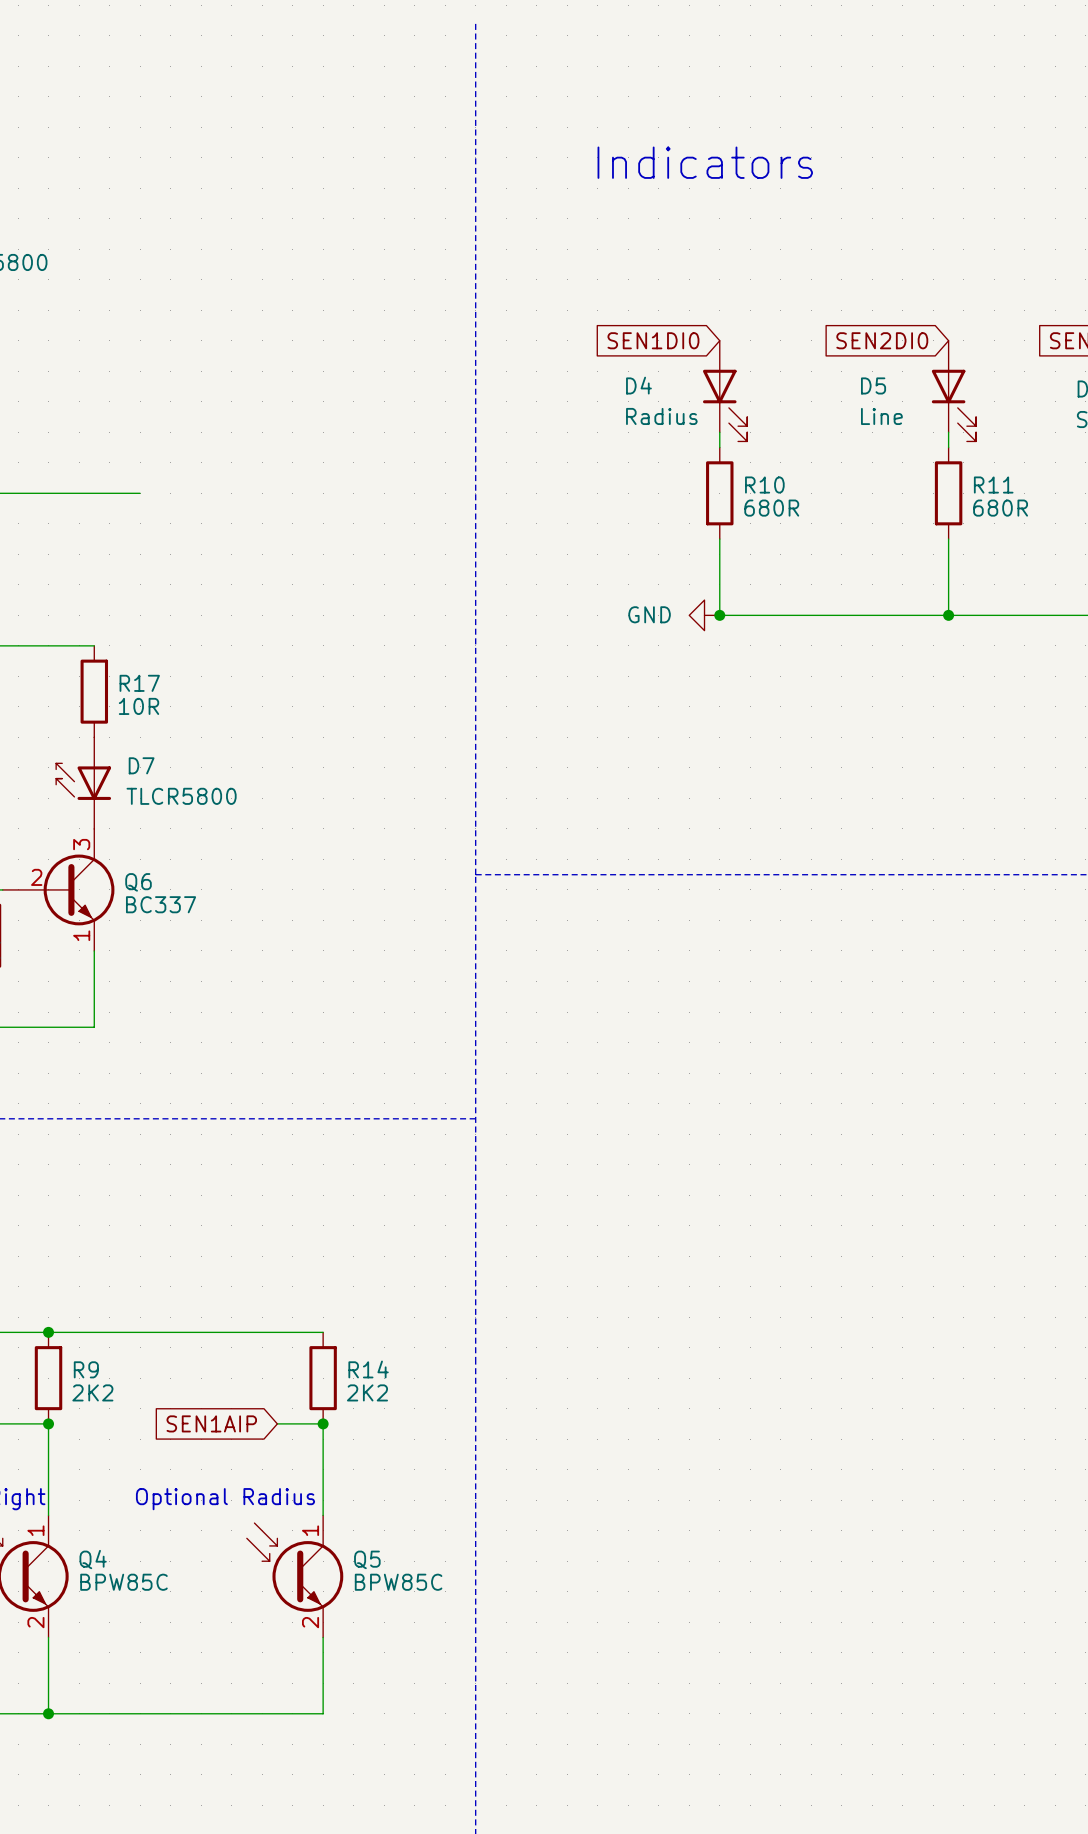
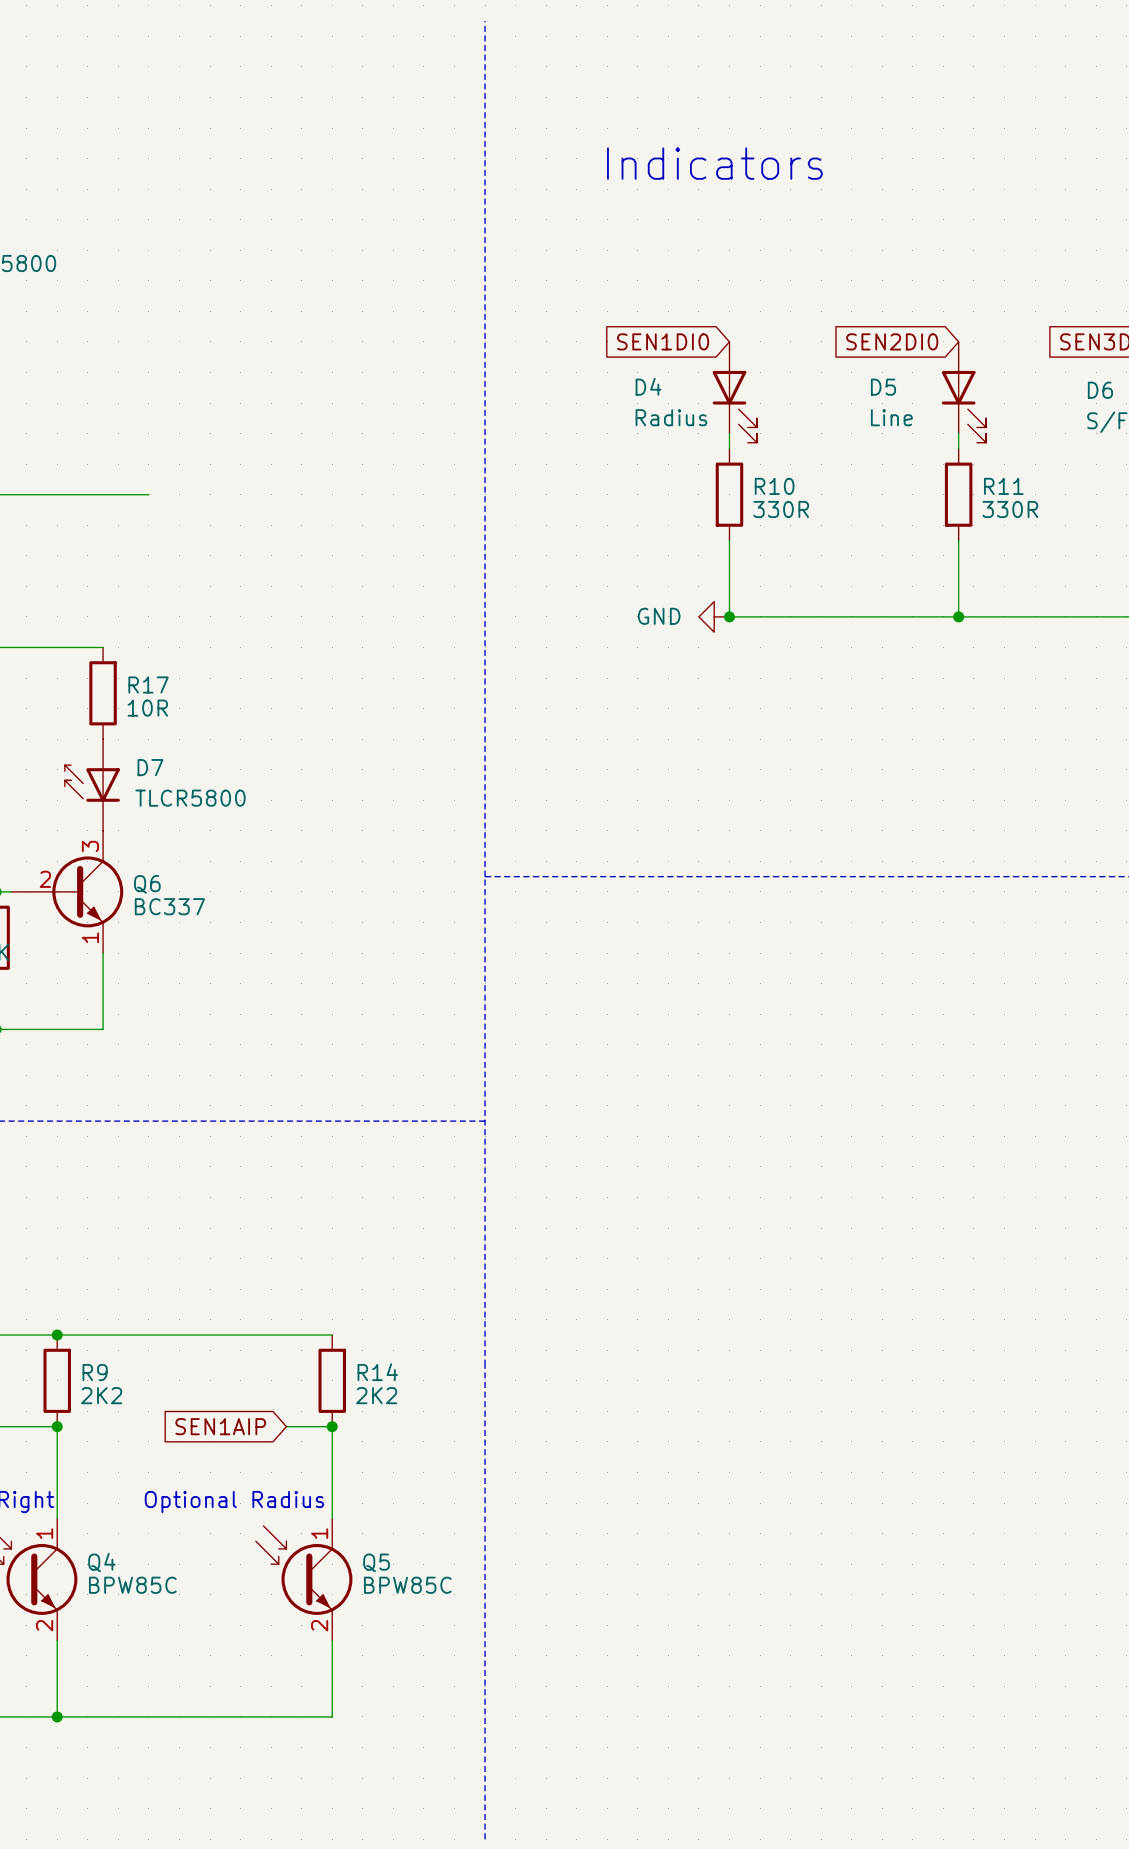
R10 value: 680R (771, 508) -> 330R (781, 509)
R11 value: 680R (1000, 508) -> 330R (1010, 509)

